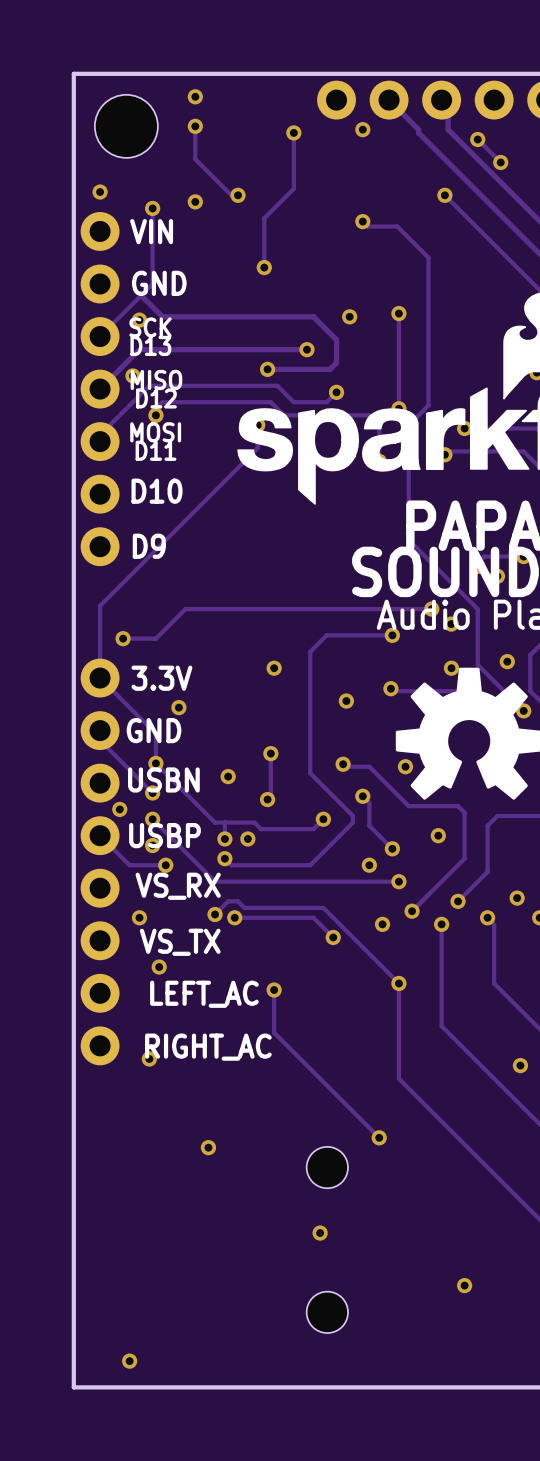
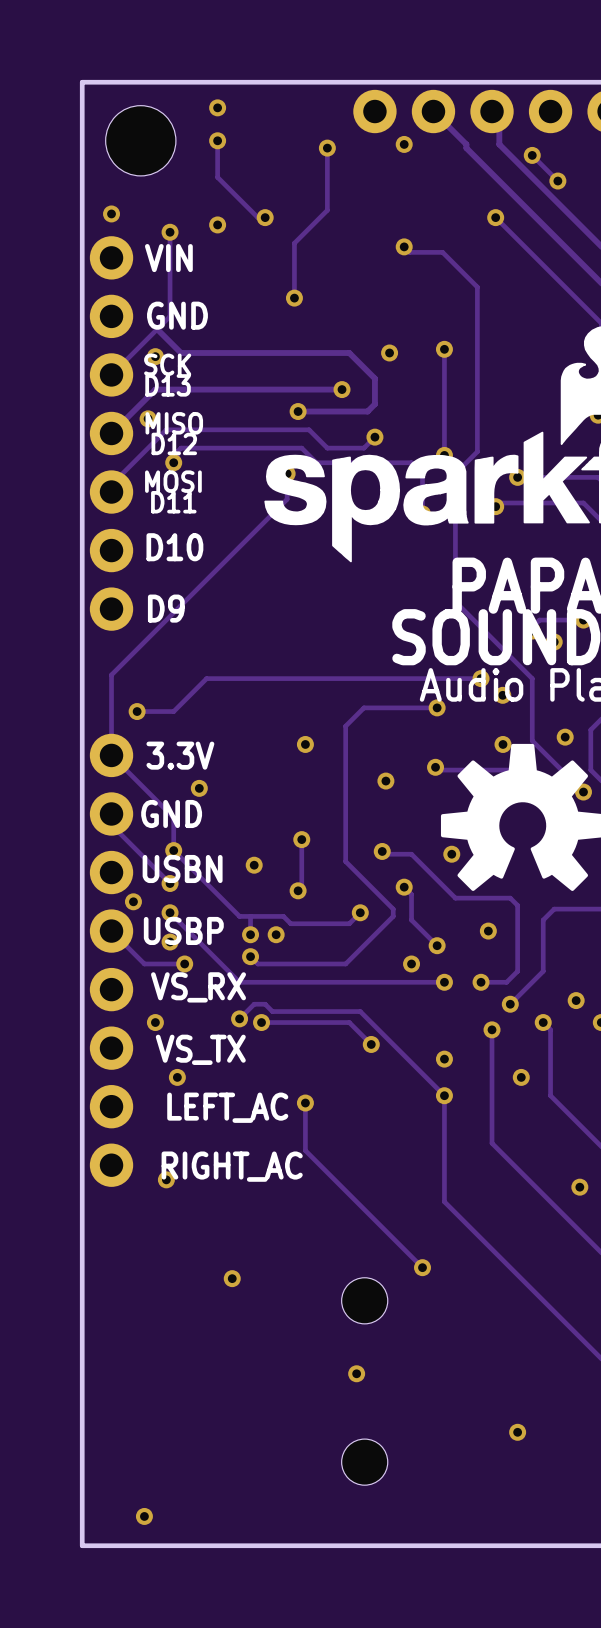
track: (464, 858) (412, 911) -> (517, 956) (517, 971) (506, 982) (481, 982)
via: none -> (481, 982)
via: (412, 911) -> none
via: (382, 924) -> none
via: none -> (444, 1059)
via: none -> (521, 1077)

